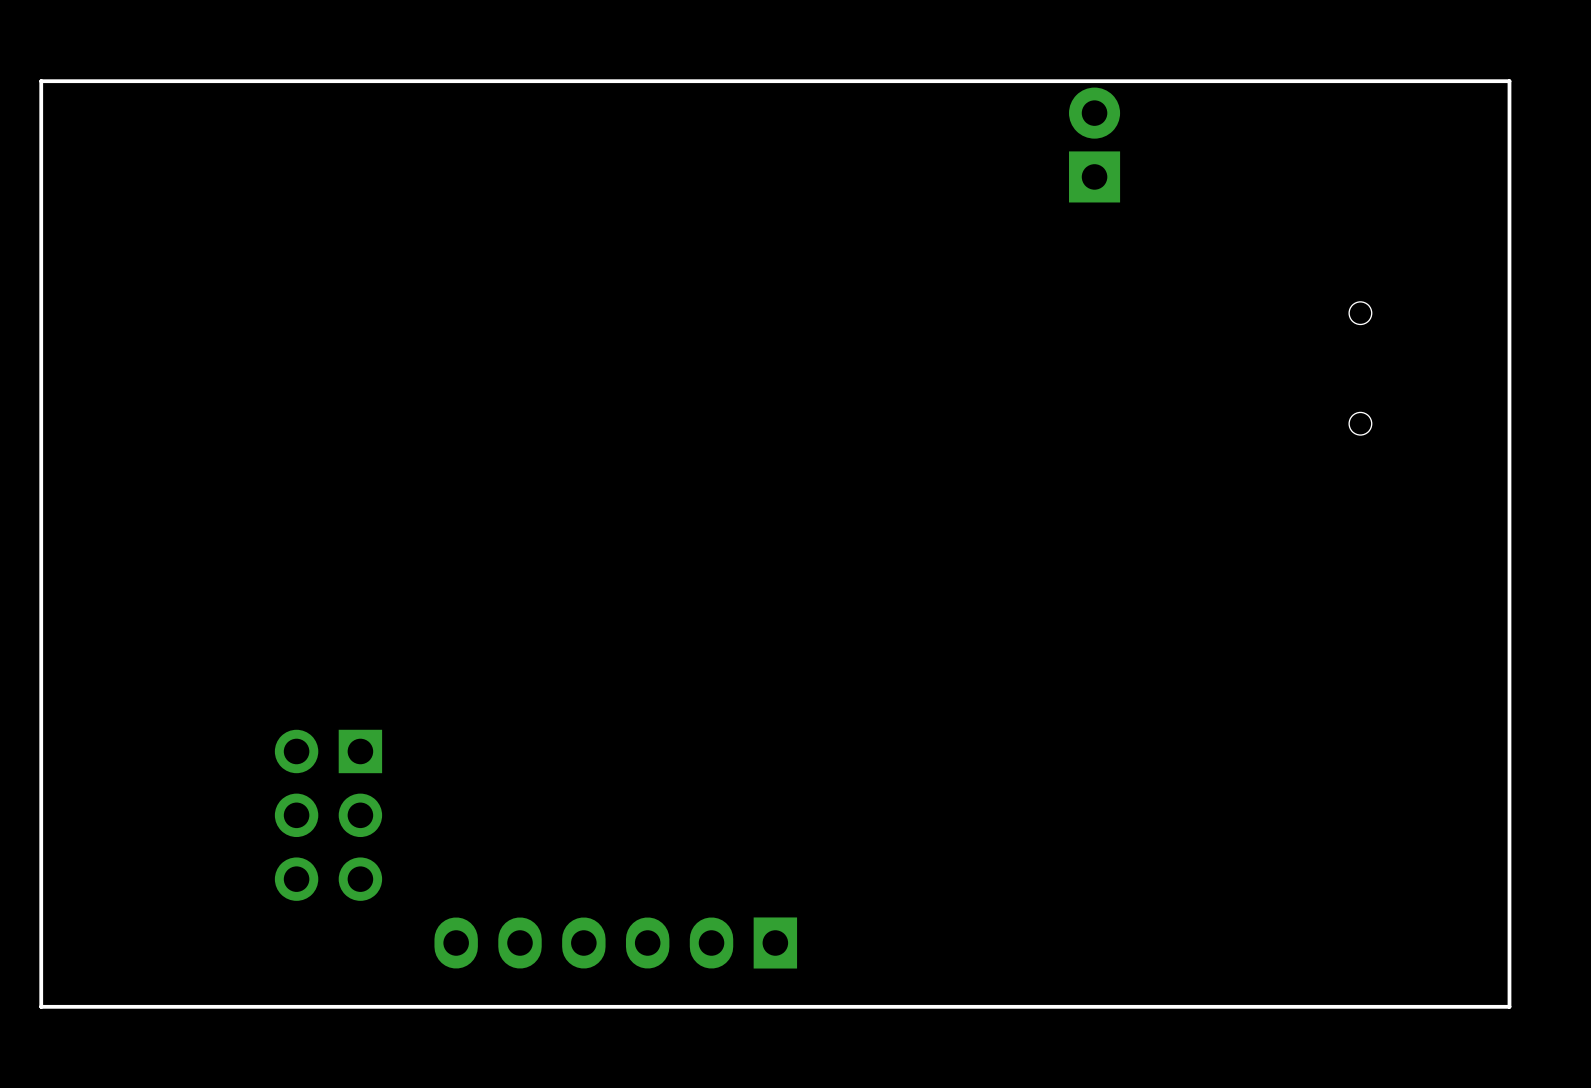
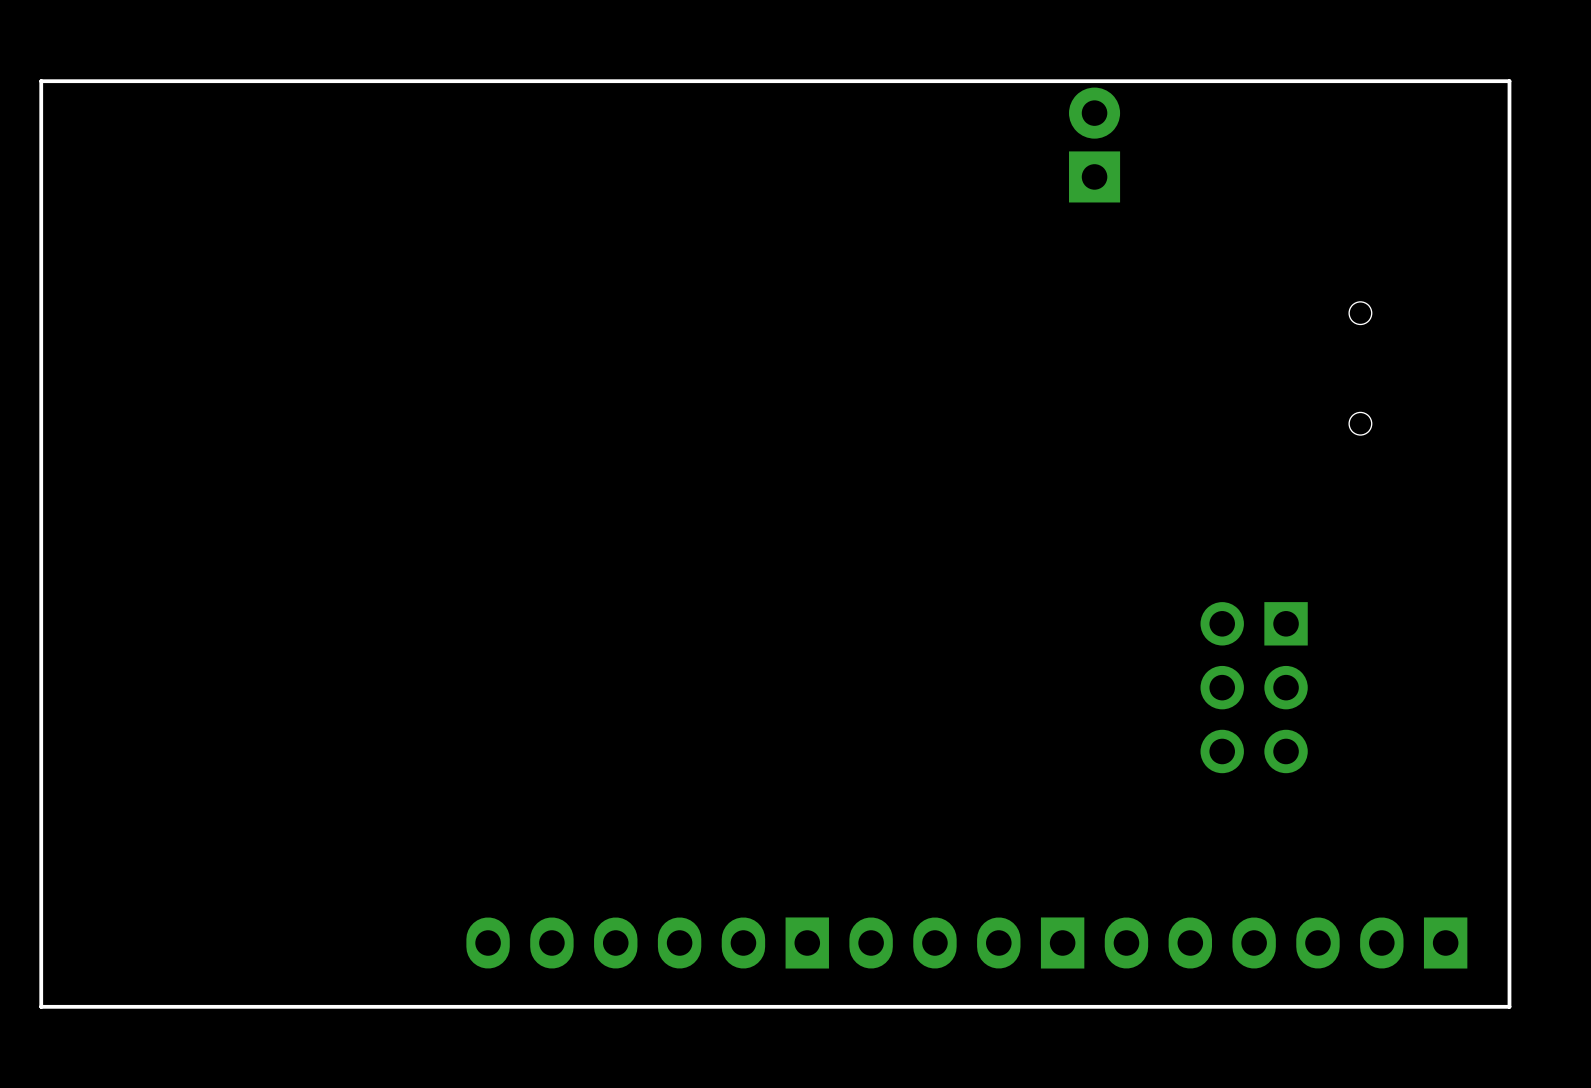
part: none -> (1254, 687)
part: (328, 815) -> none
part position: (615, 942) -> (647, 942)
part: none -> (966, 942)
part: none -> (1286, 942)

